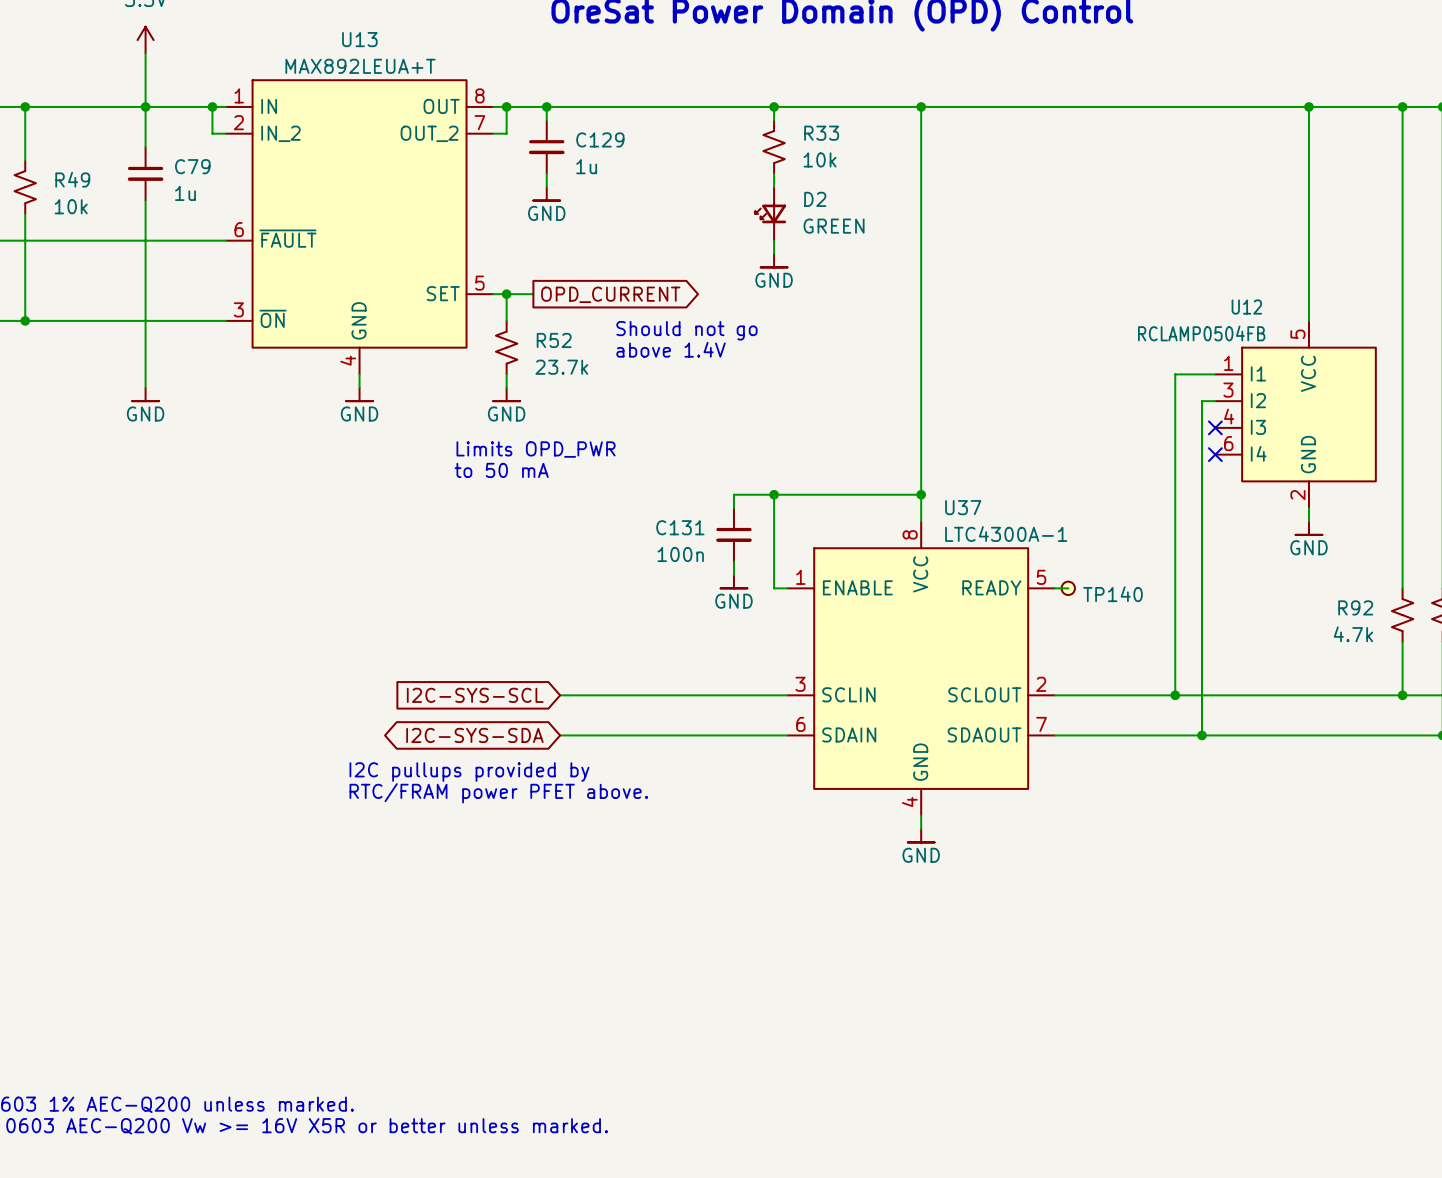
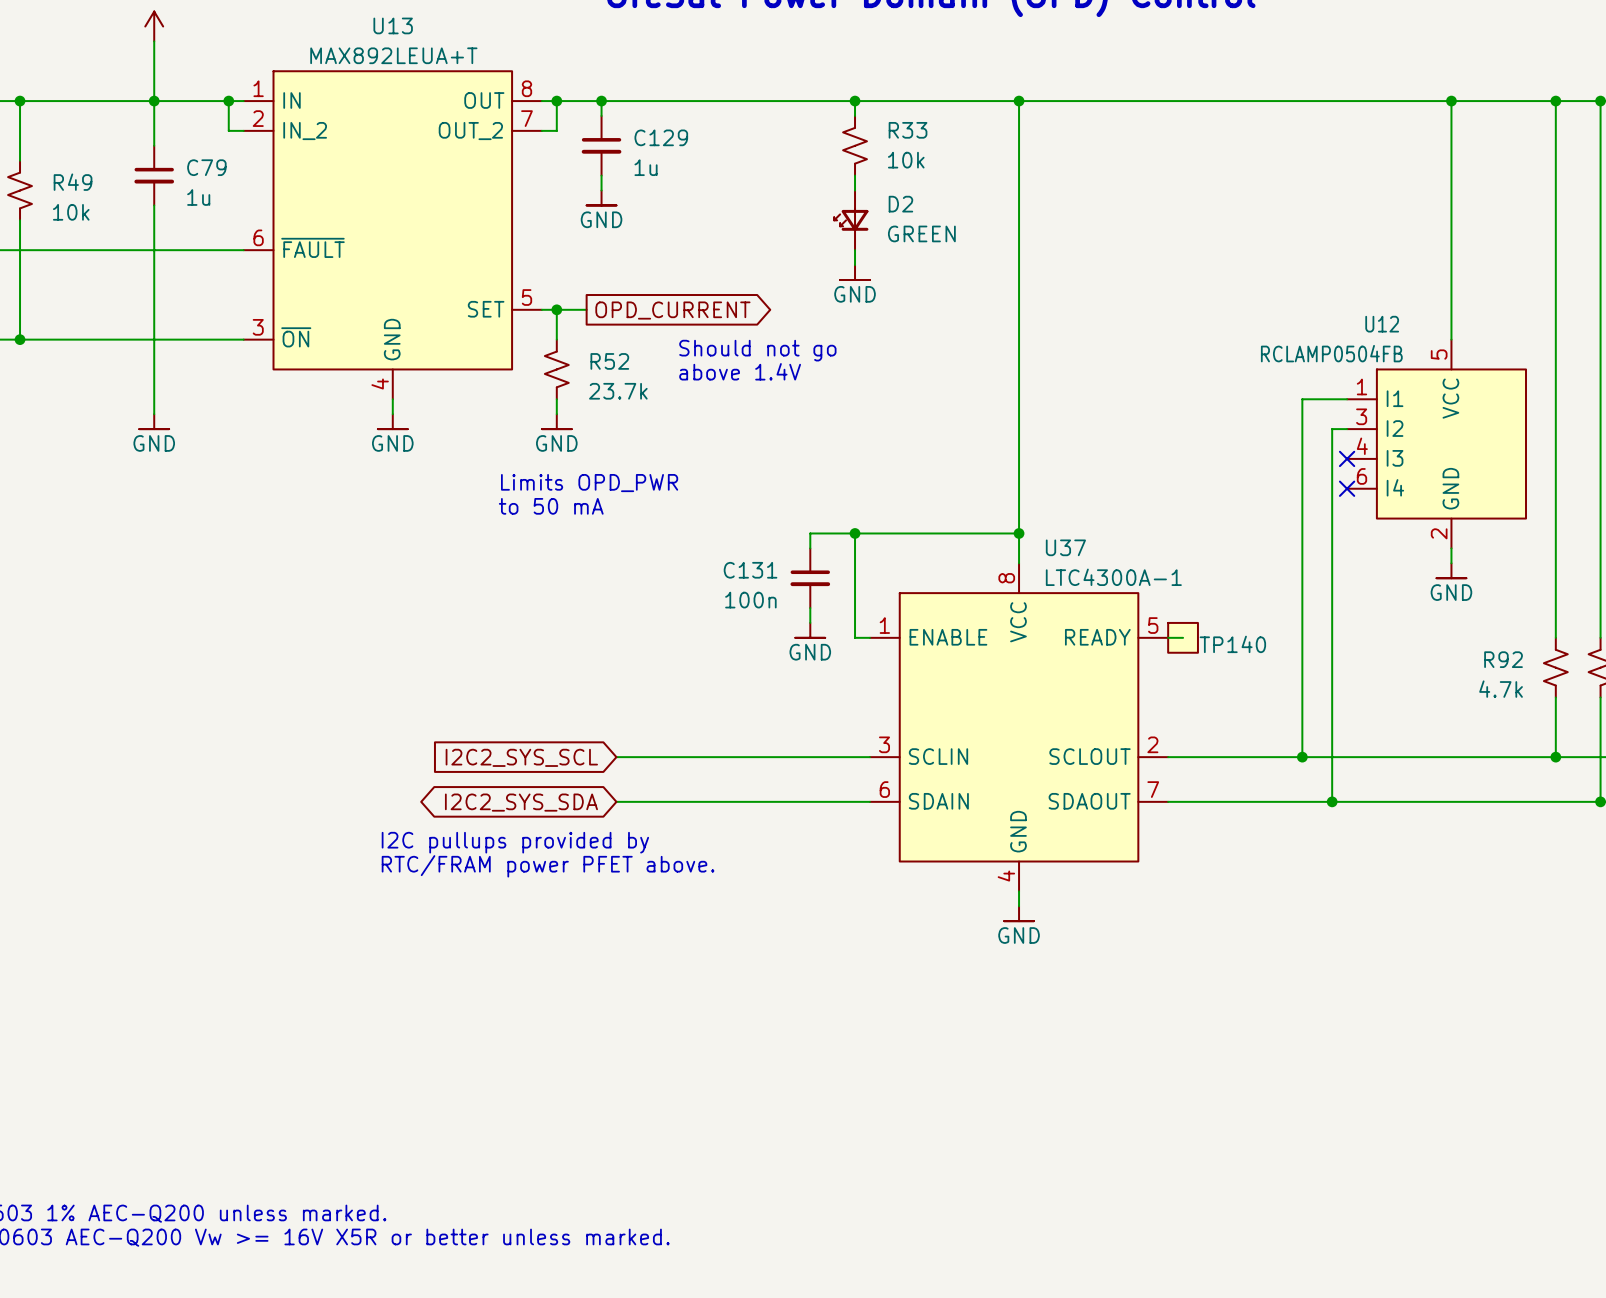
TP140 symbol: [1061, 581, 1075, 596] -> [1168, 622, 1198, 653]
global label: I2C-SYS-SCL (475, 695) -> I2C2_SYS_SCL (521, 757)
global label: I2C-SYS-SDA (474, 735) -> I2C2_SYS_SDA (521, 802)

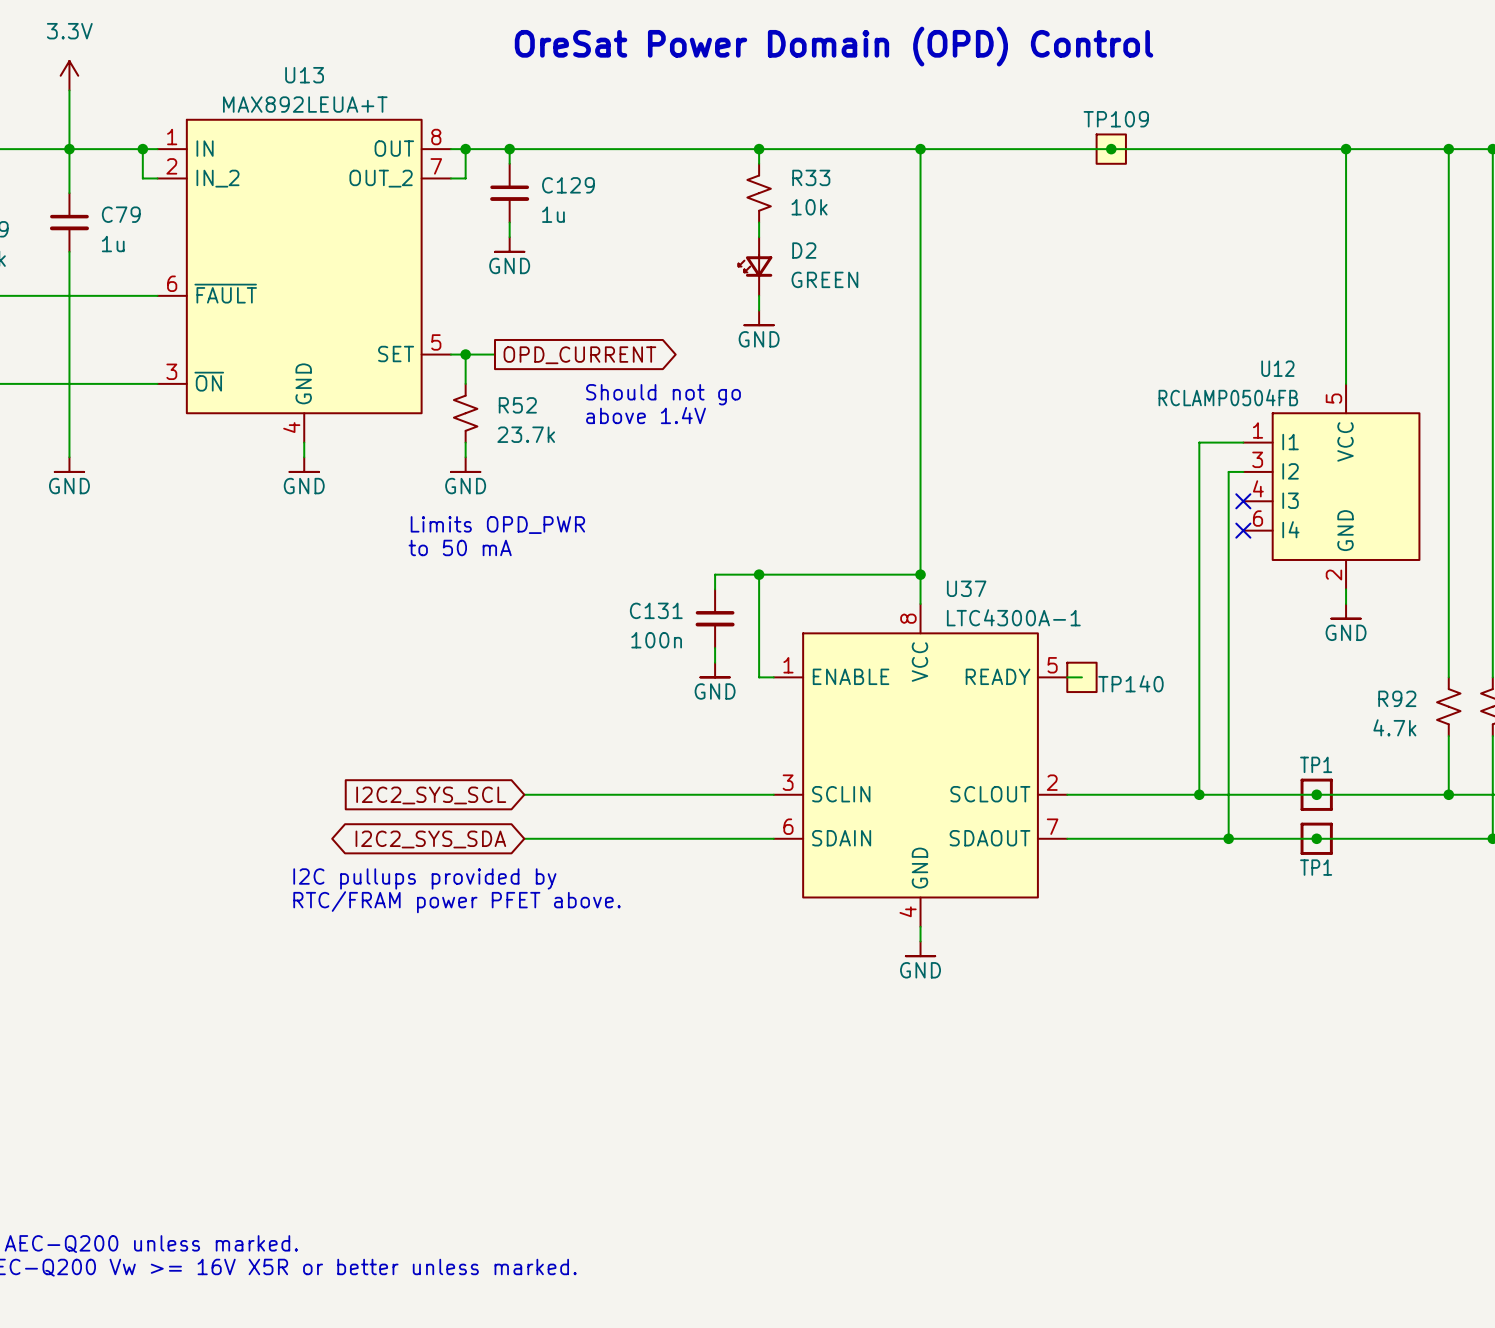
junction: none -> (1111, 149)
TP109: none -> (1111, 149)
junction: none -> (1316, 794)
TP1: none -> (1316, 794)
junction: none -> (1316, 838)
TP1: none -> (1316, 838)

